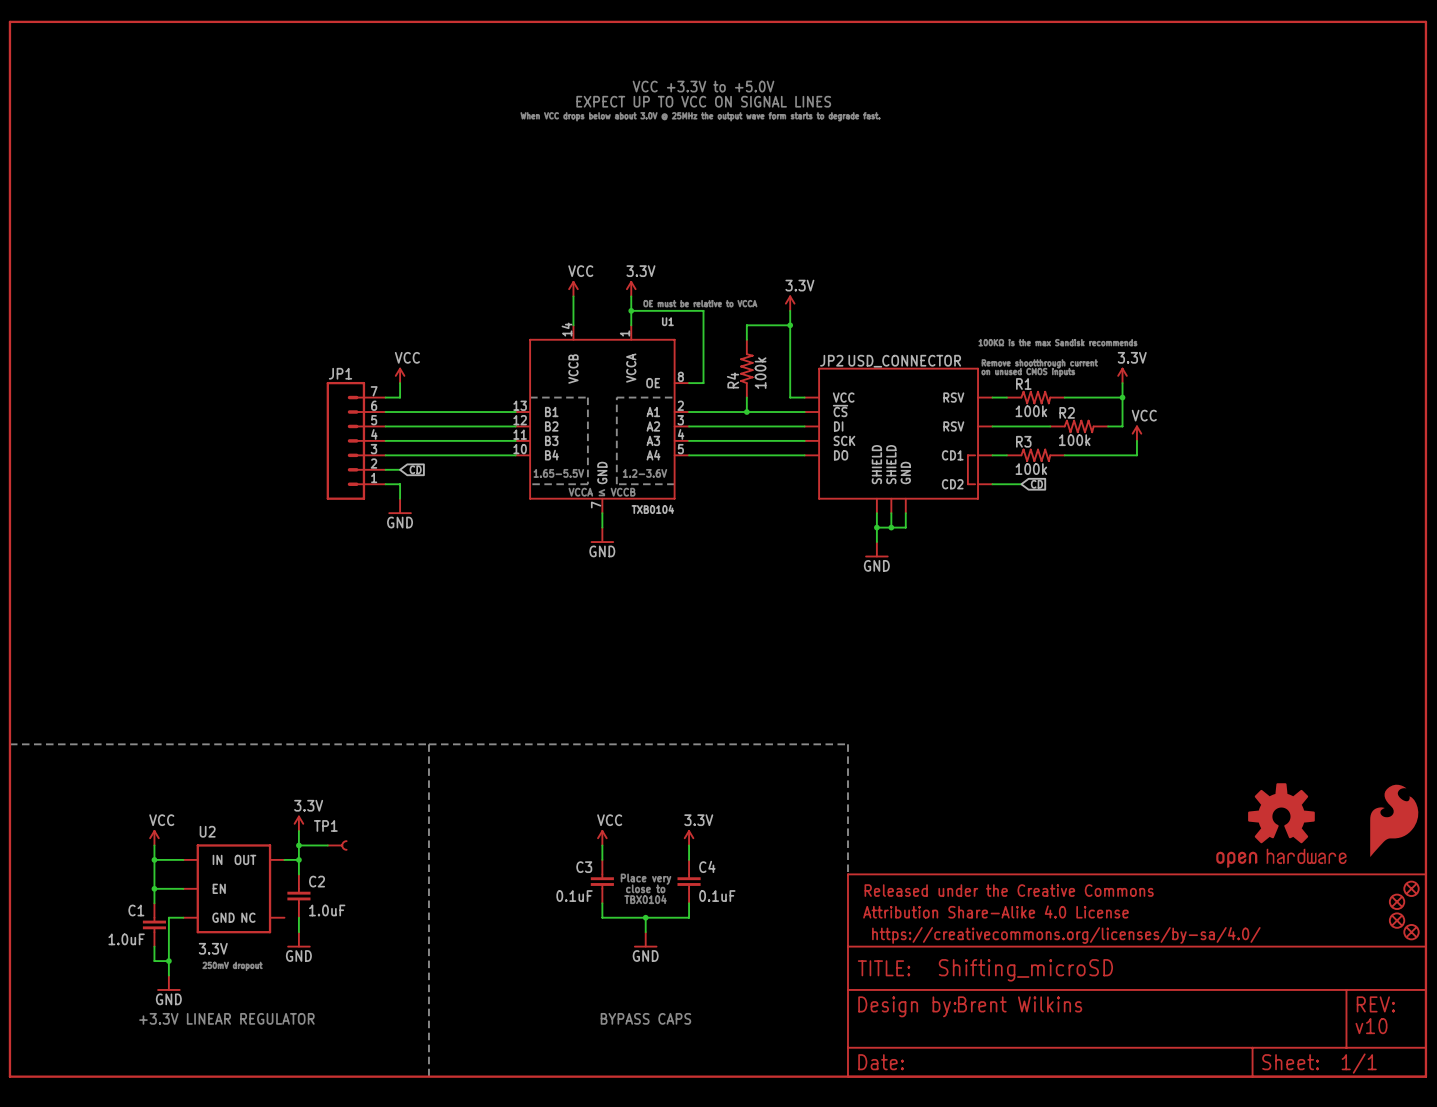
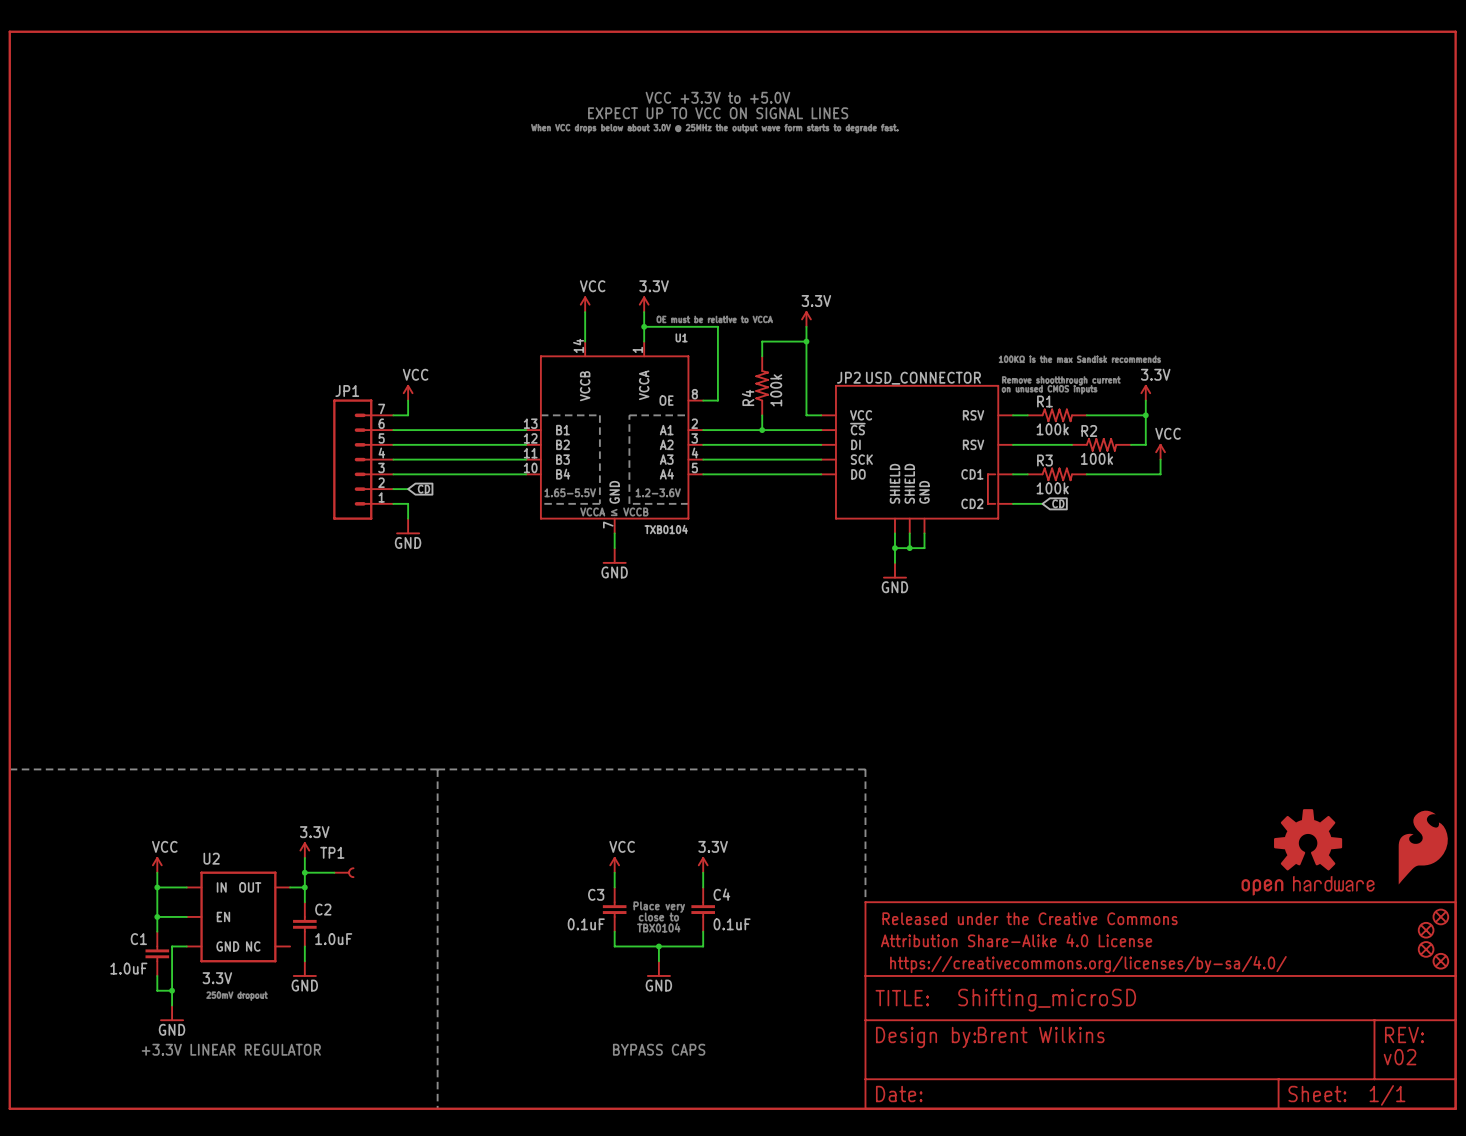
text: v10 (1371, 1026) -> v02 (1400, 1057)

